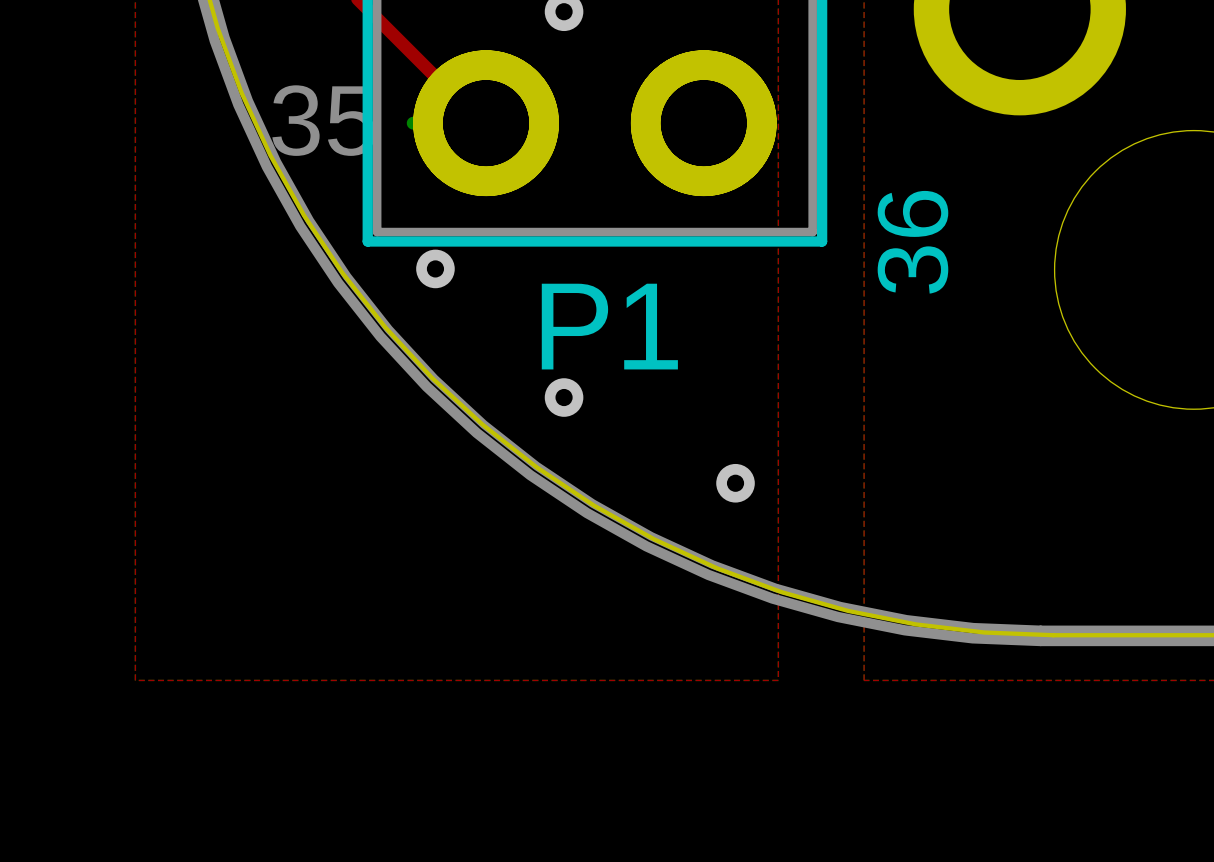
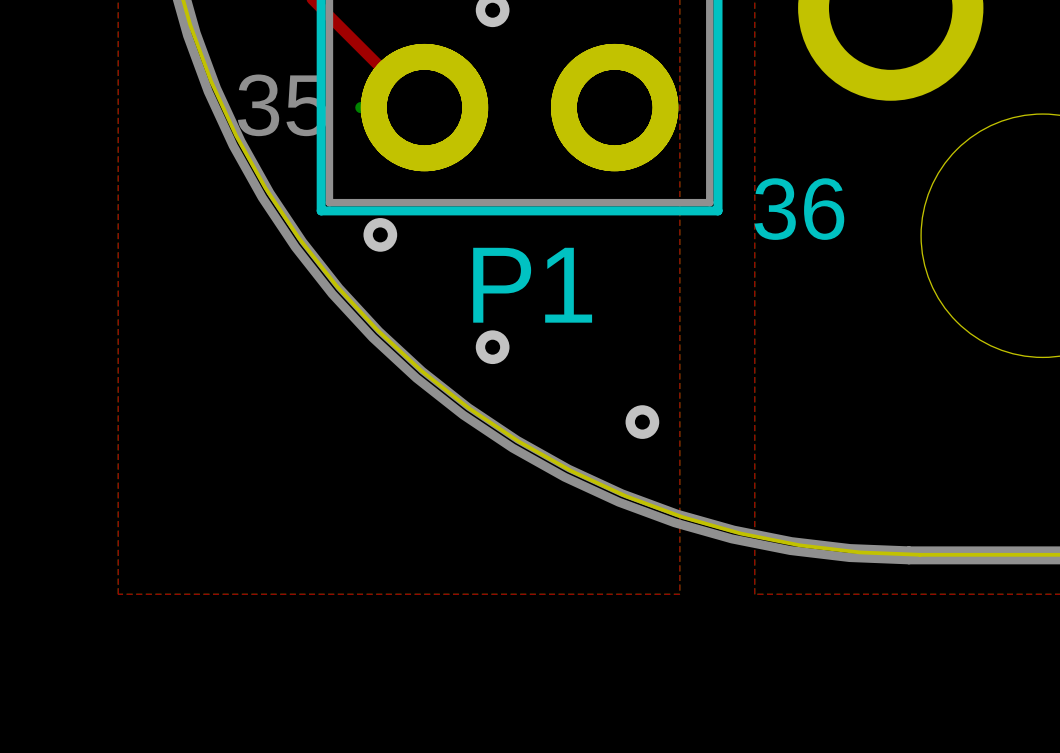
text rotation: 0° (912, 242) -> 90° clockwise (799, 209)

